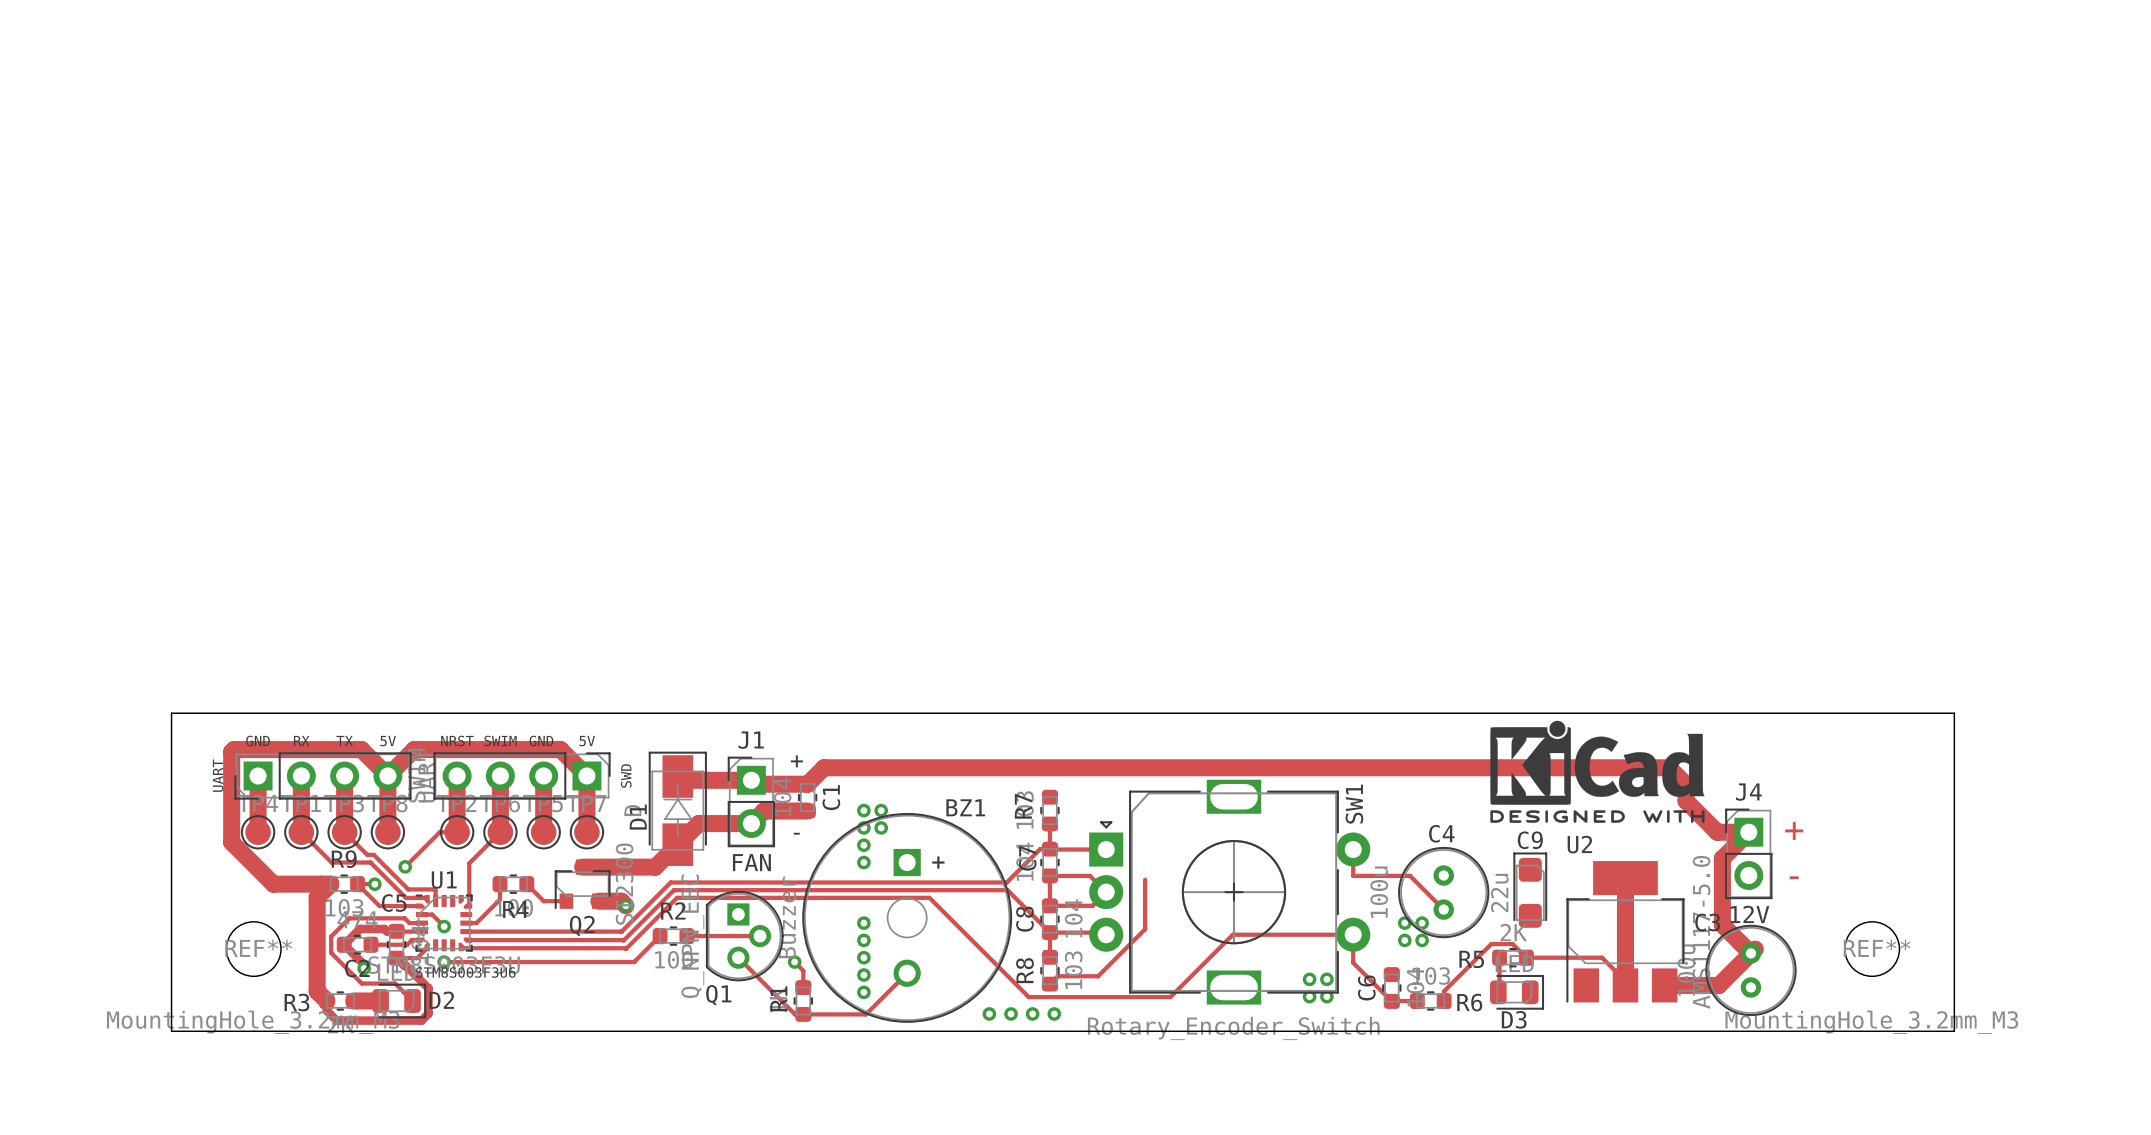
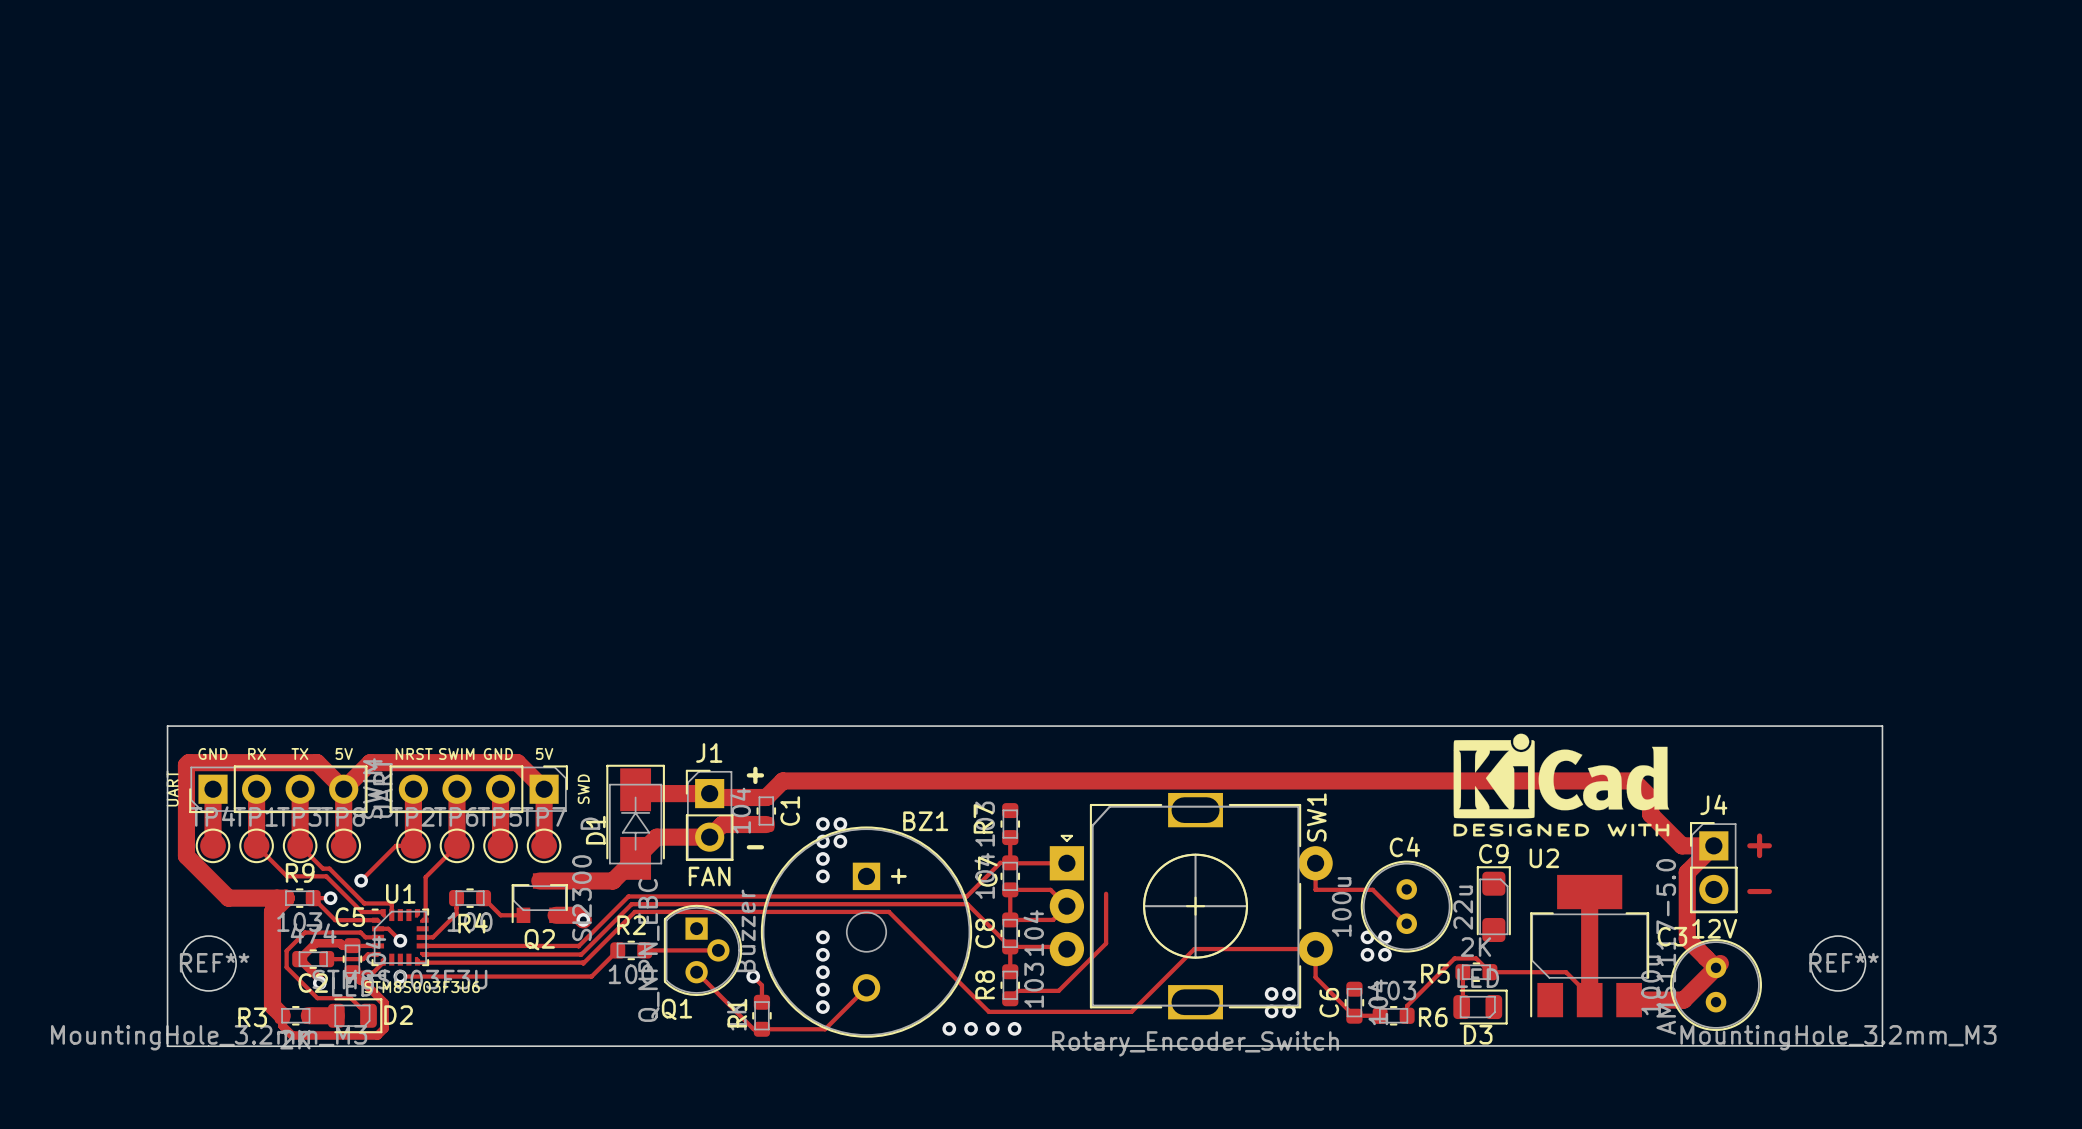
board edge: (212, 713) (171, 713) (171, 1031) (212, 1031) -> (167, 726) (167, 1046)
board edge: (1916, 713) (1954, 713) (1954, 1031) (253, 1031) -> (1882, 726) (1882, 1045) (208, 1046)

